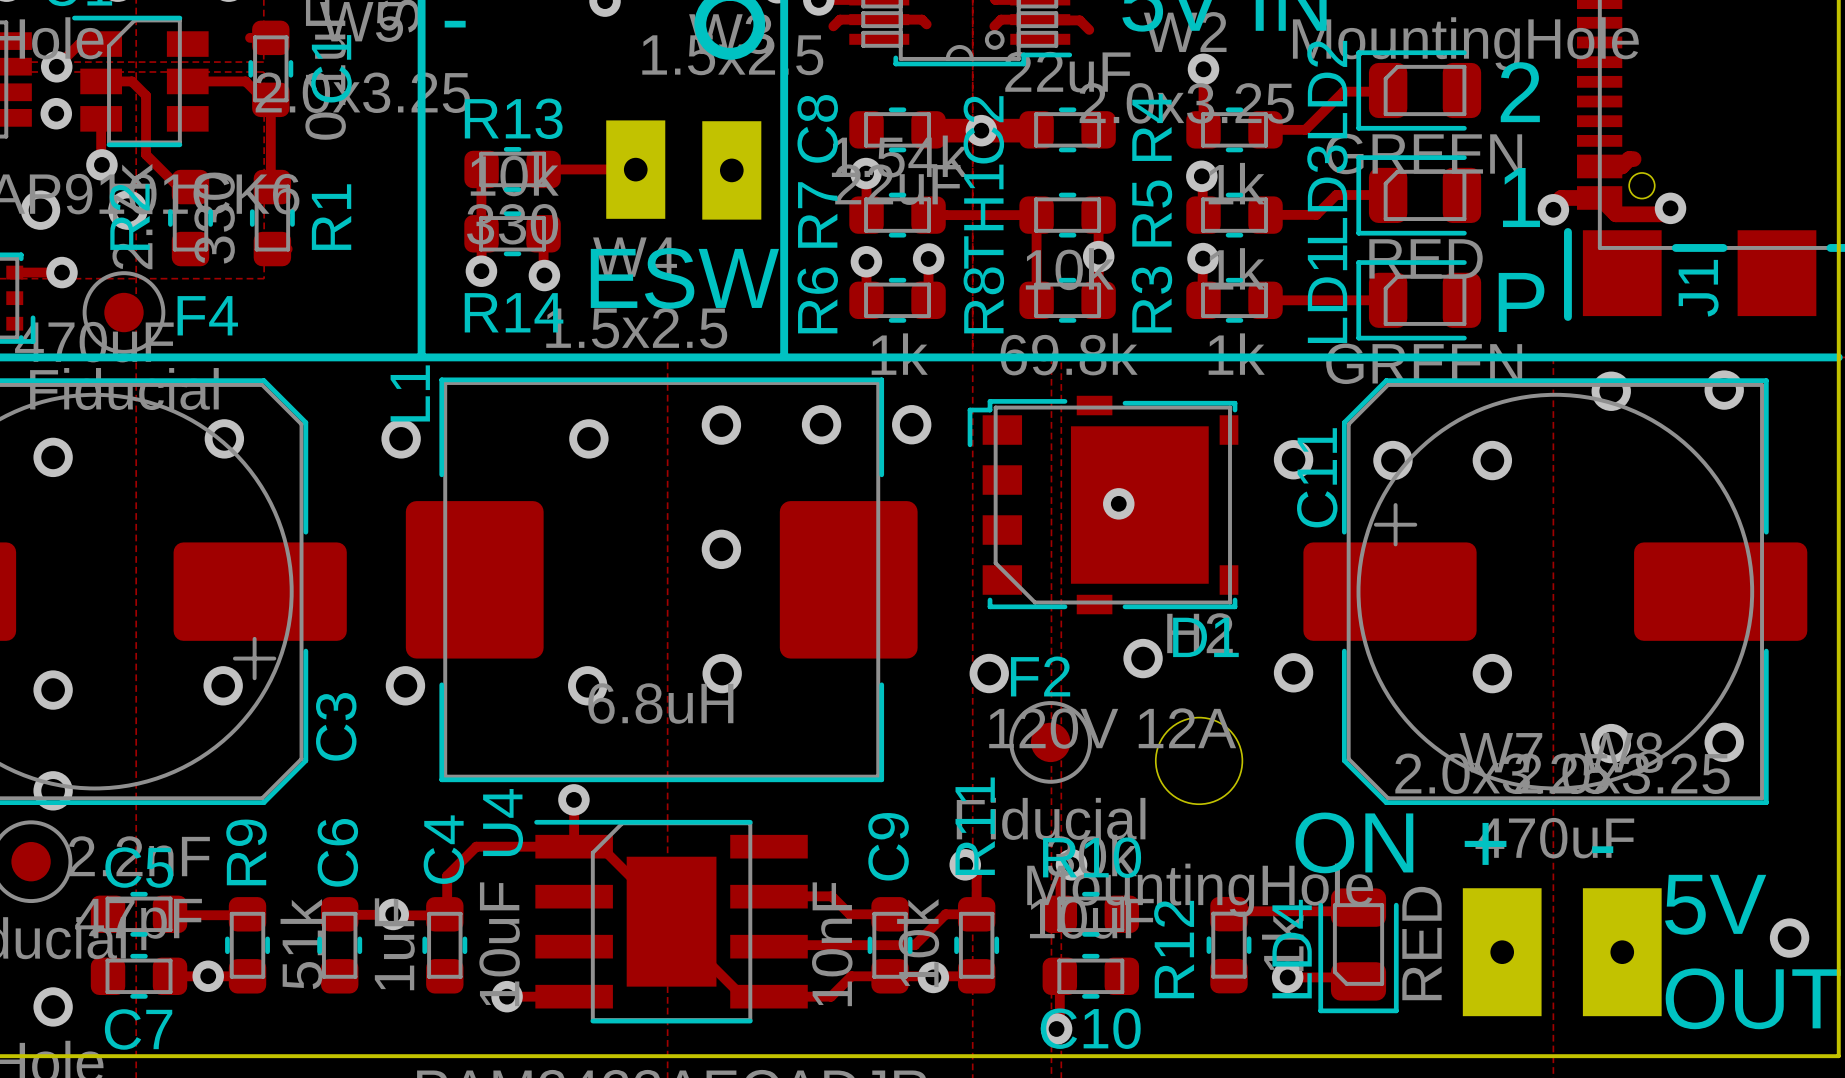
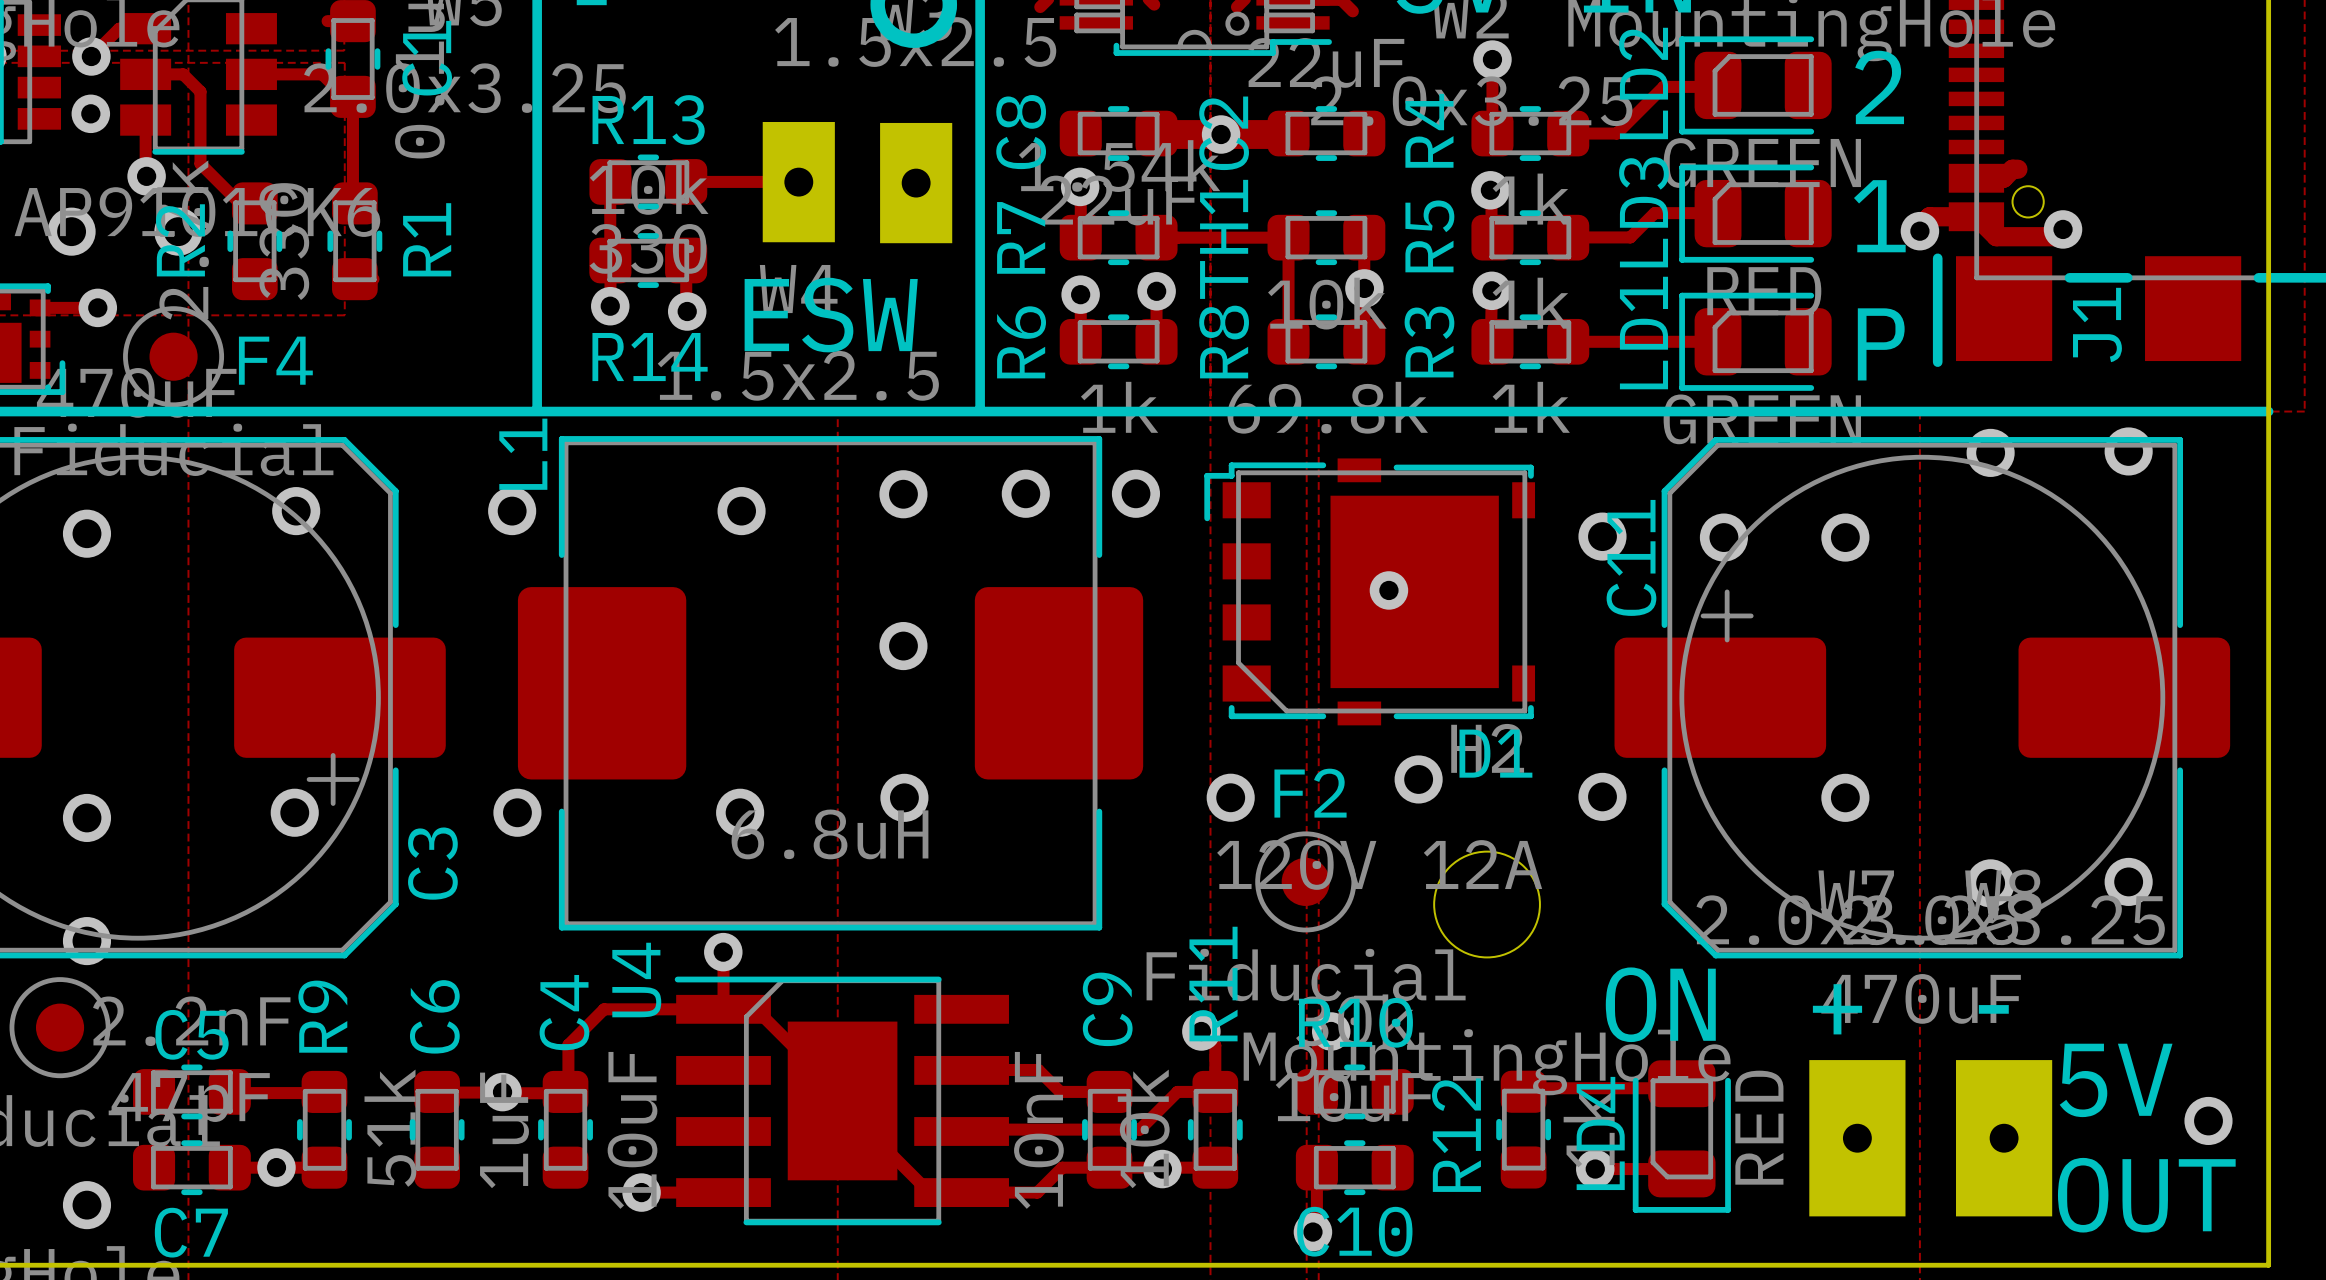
F2 name position: F2 (1040, 676) -> F2 (1310, 793)

